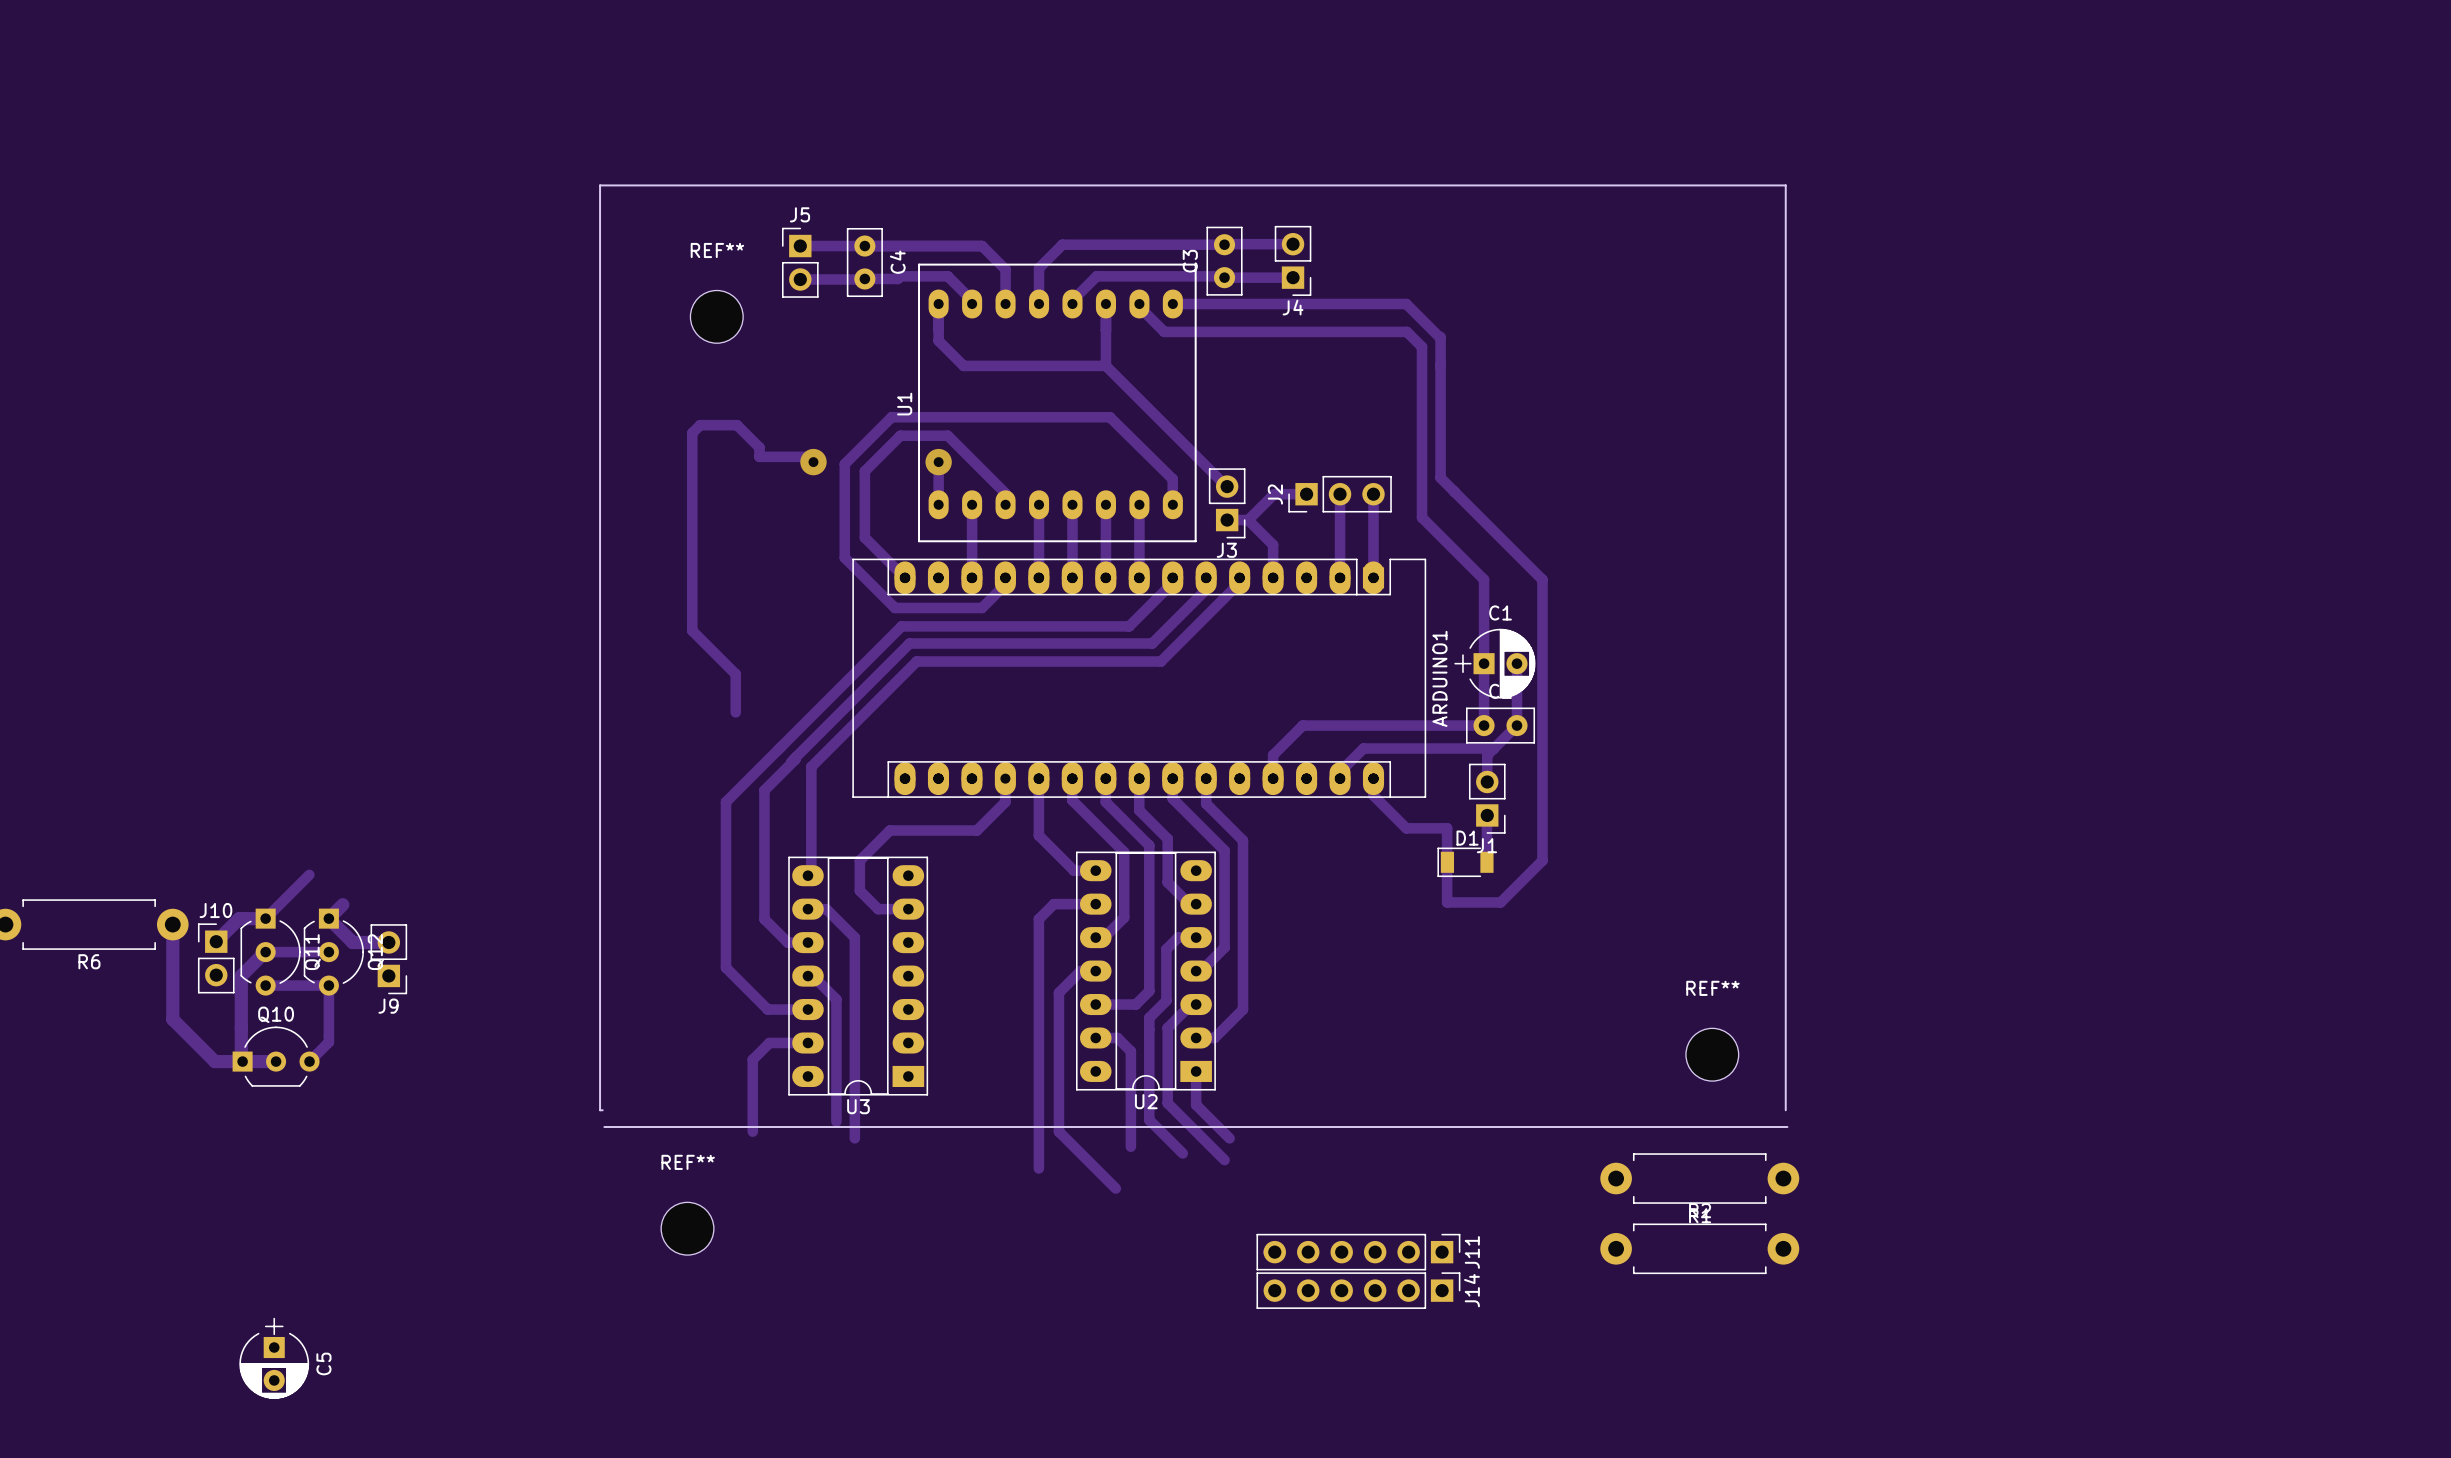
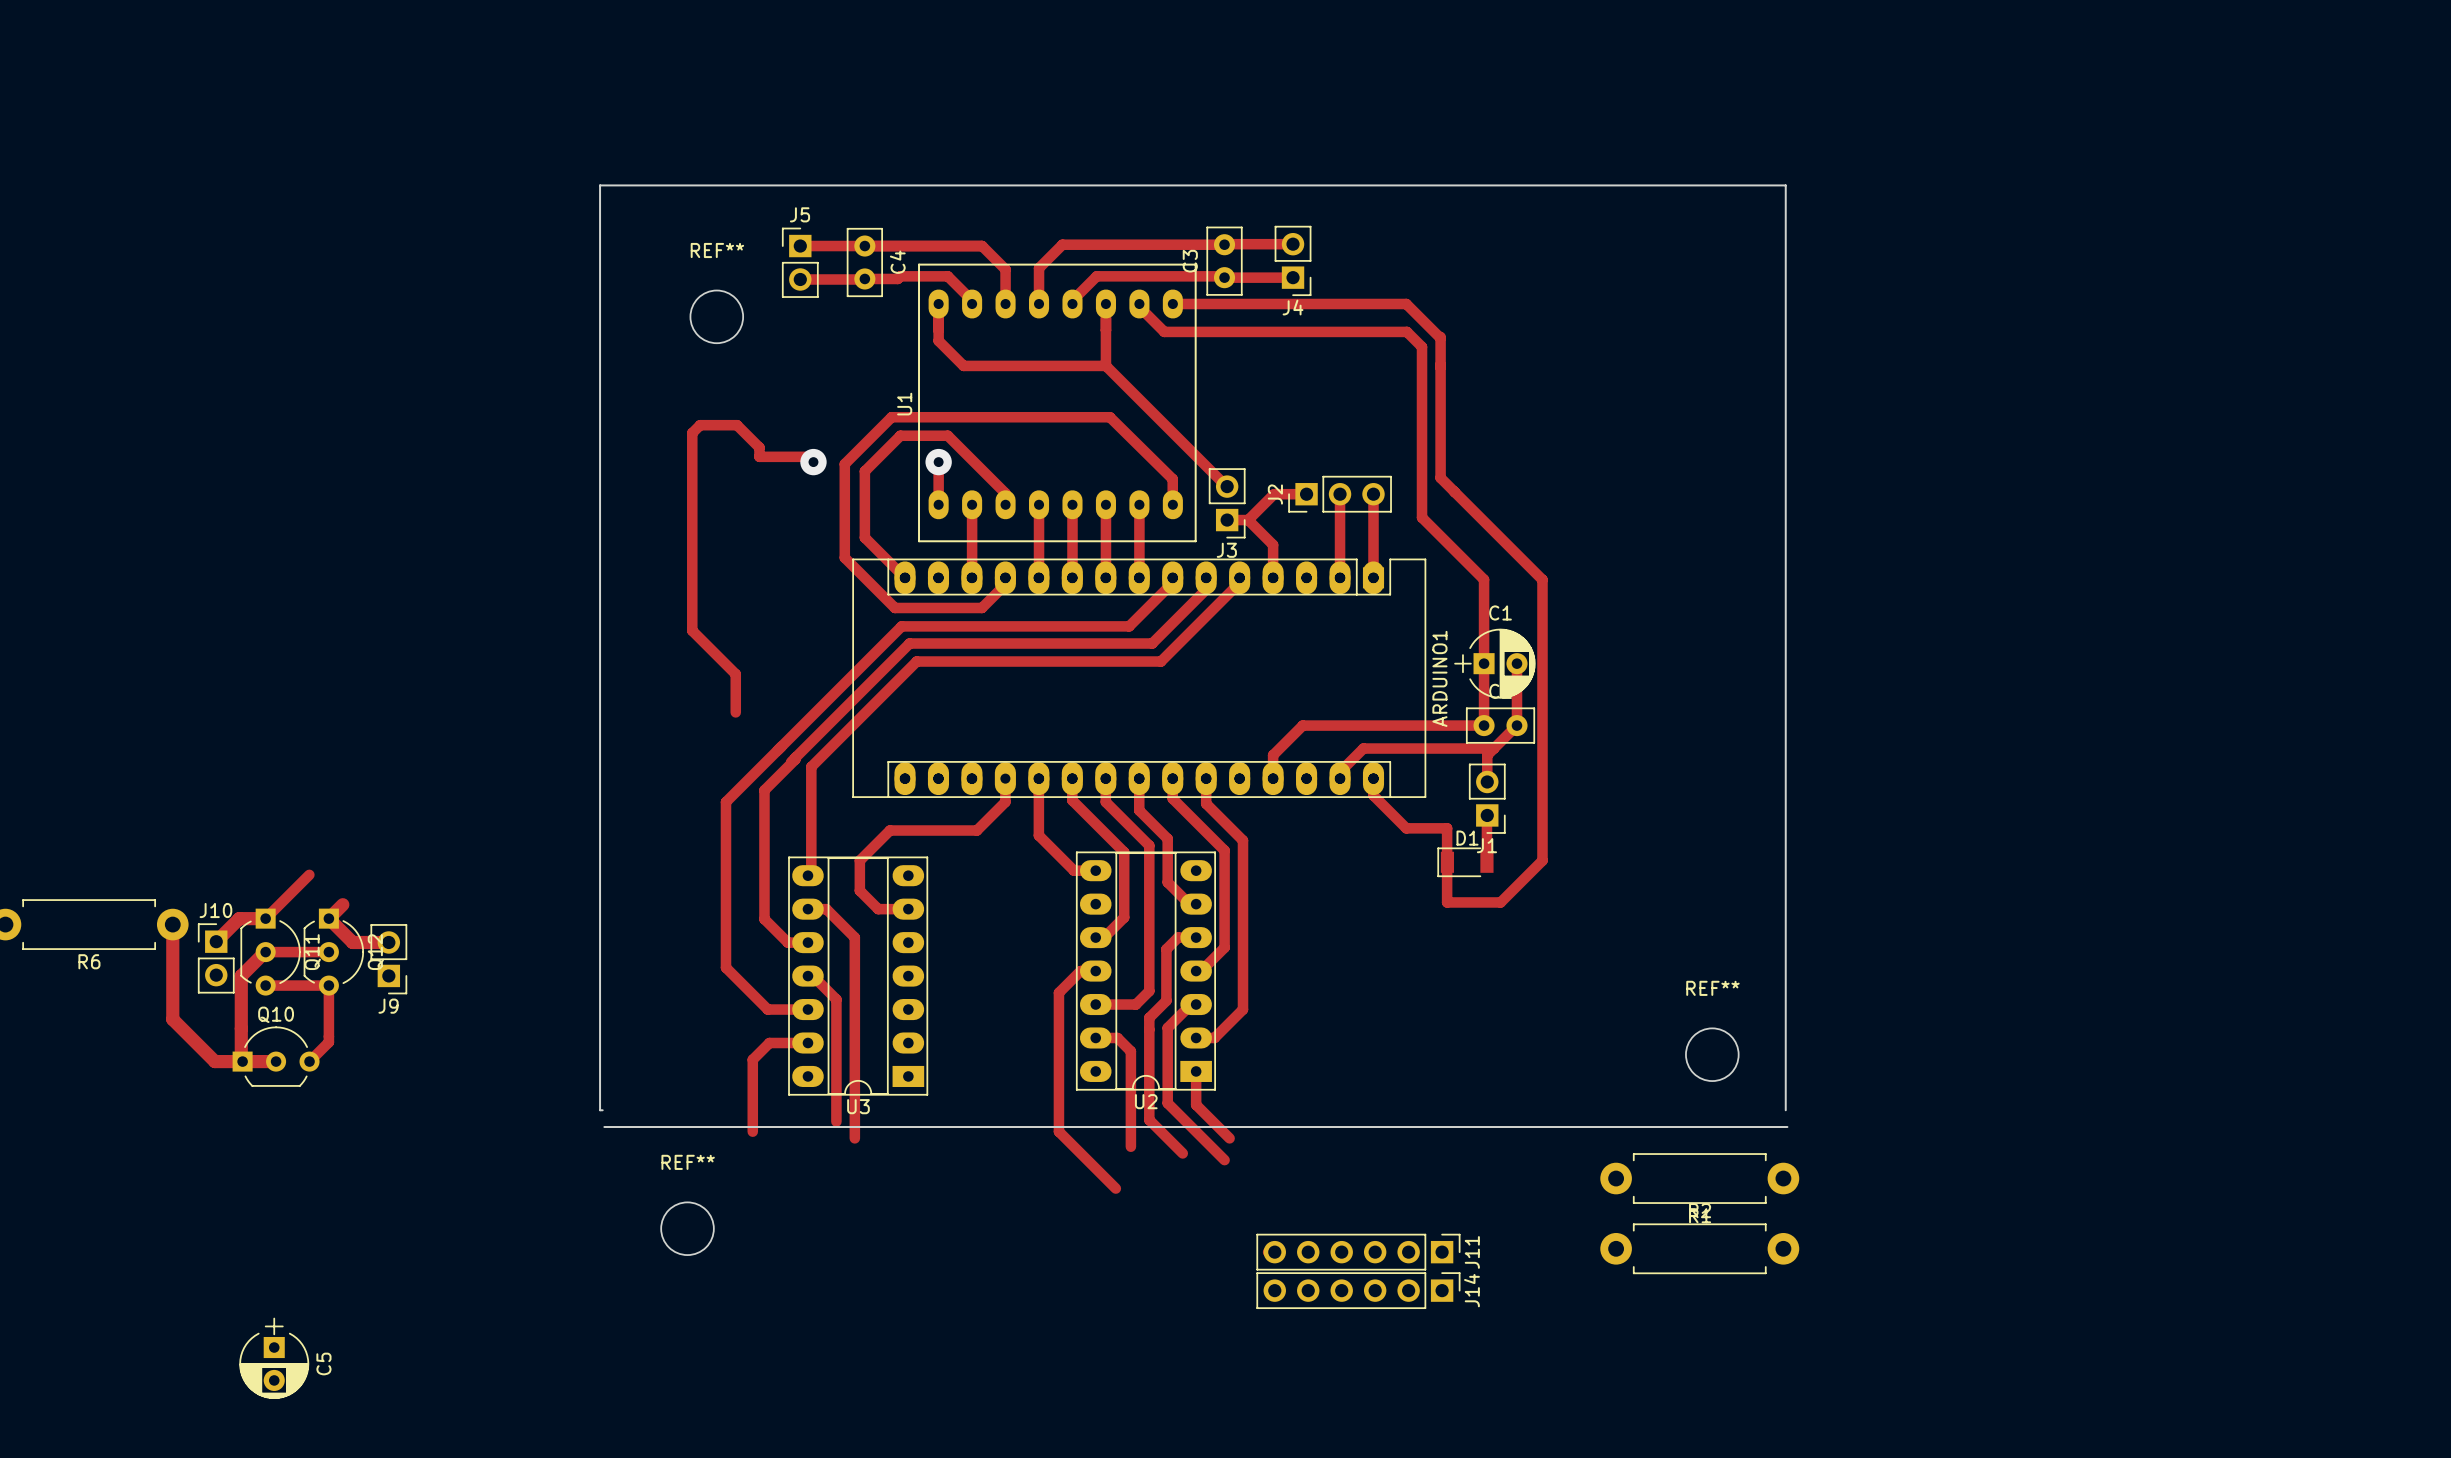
track: (1095, 904) (1053, 904) (1038, 919) (1038, 1168) -> none

